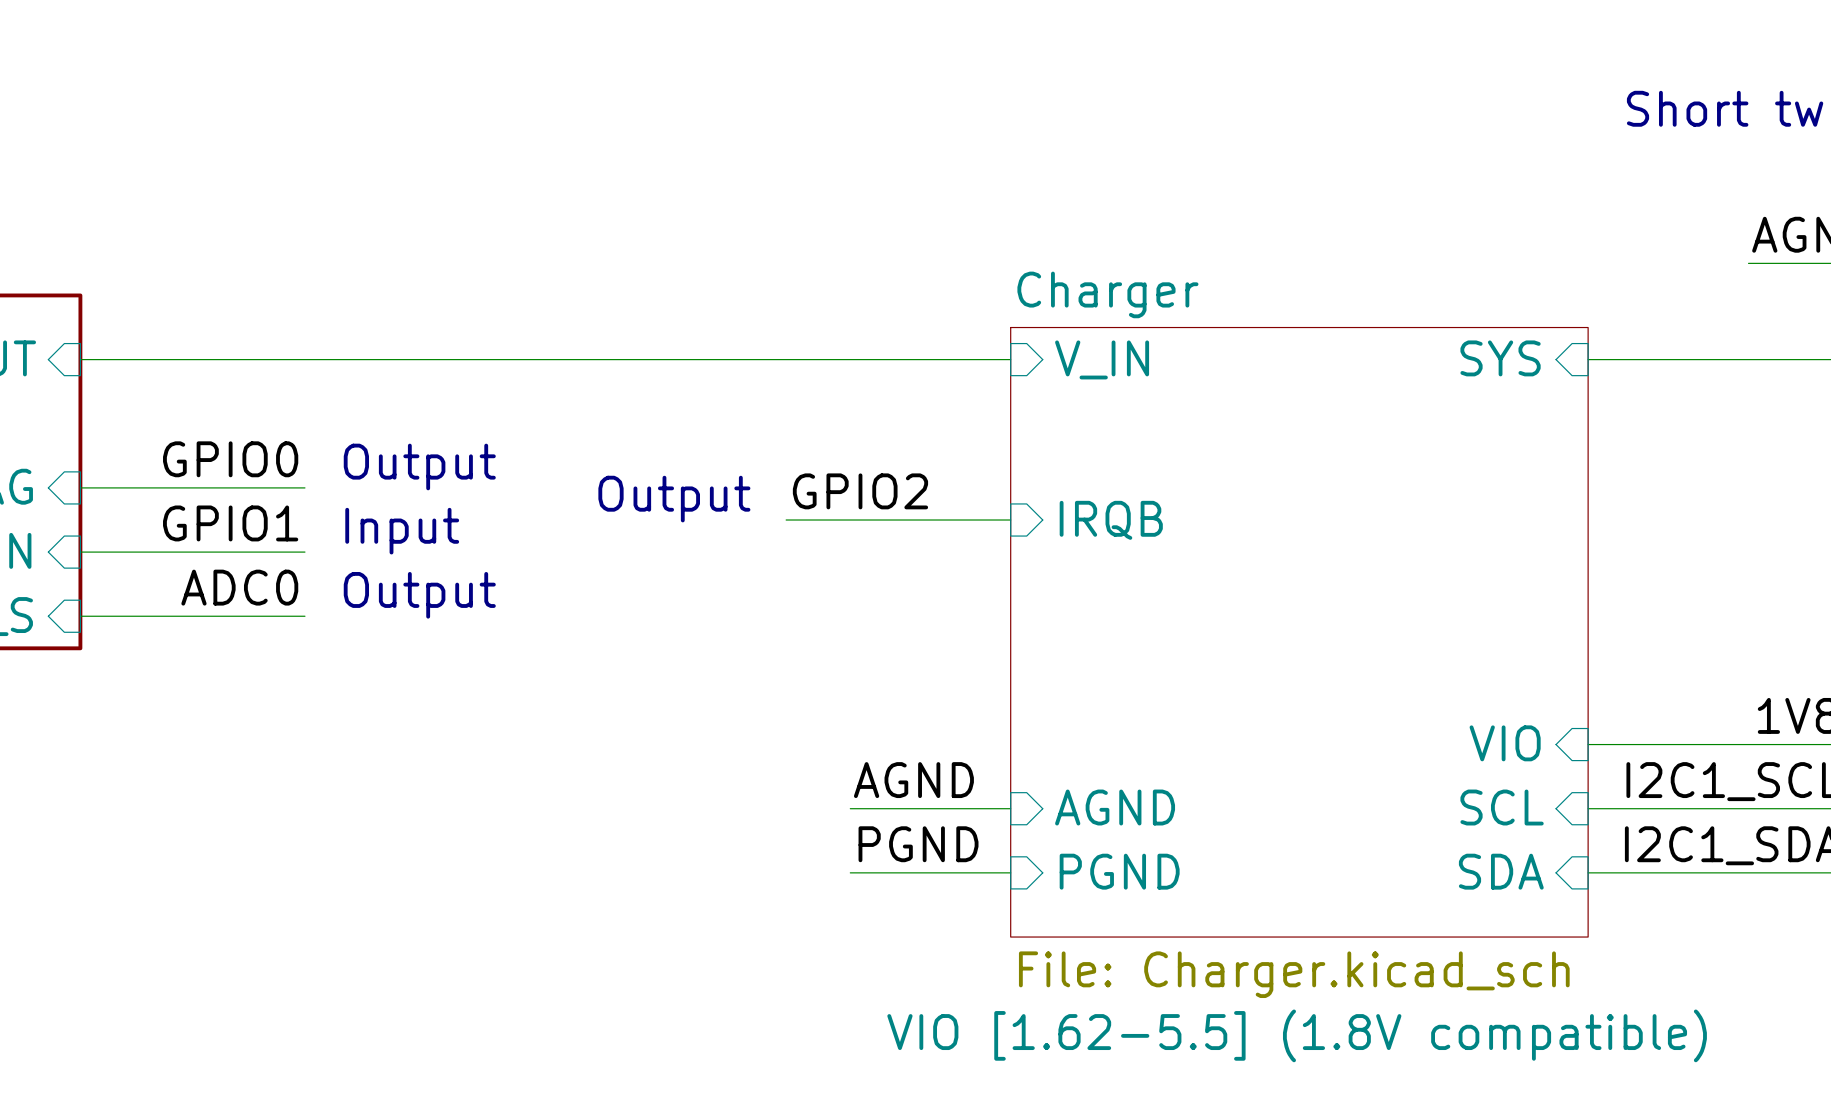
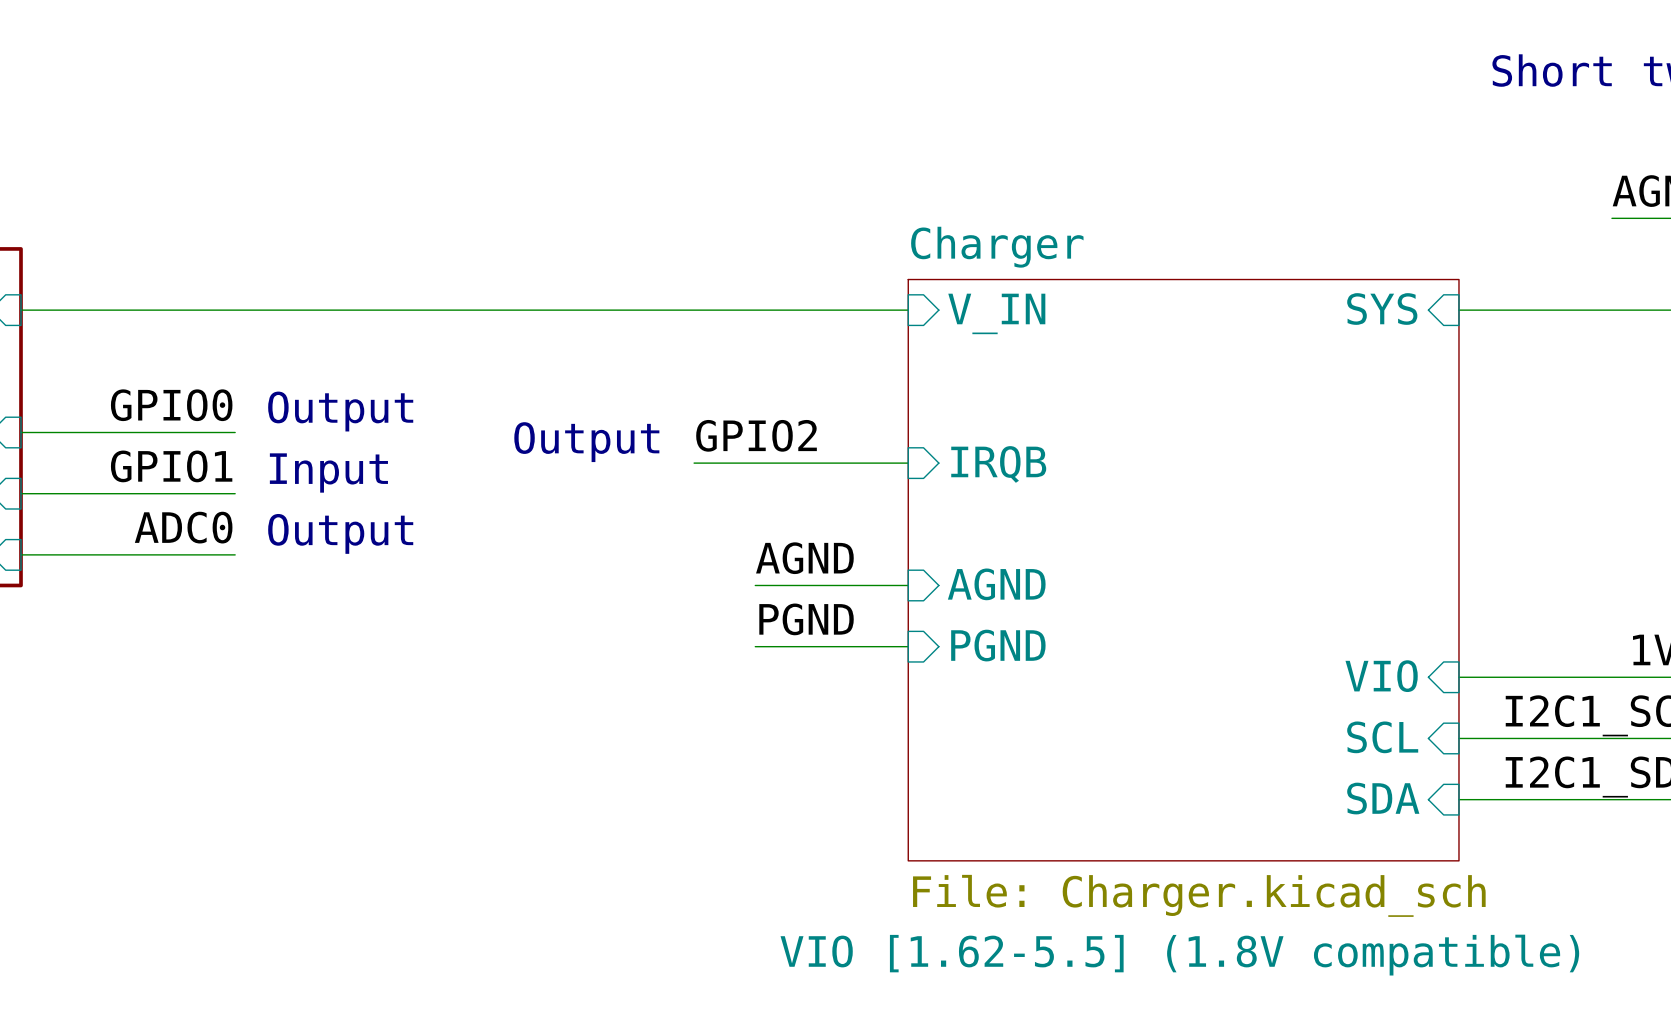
label position: AGND (913, 780) -> AGND (804, 558)
sheet pin position: AGND (1115, 807) -> AGND (996, 584)
wire: (850, 808) (1010, 808) -> (755, 585) (908, 585)
label position: PGND (918, 844) -> PGND (806, 619)
sheet pin position: PGND (1119, 871) -> PGND (998, 645)
wire: (850, 872) (1010, 872) -> (755, 646) (908, 646)

